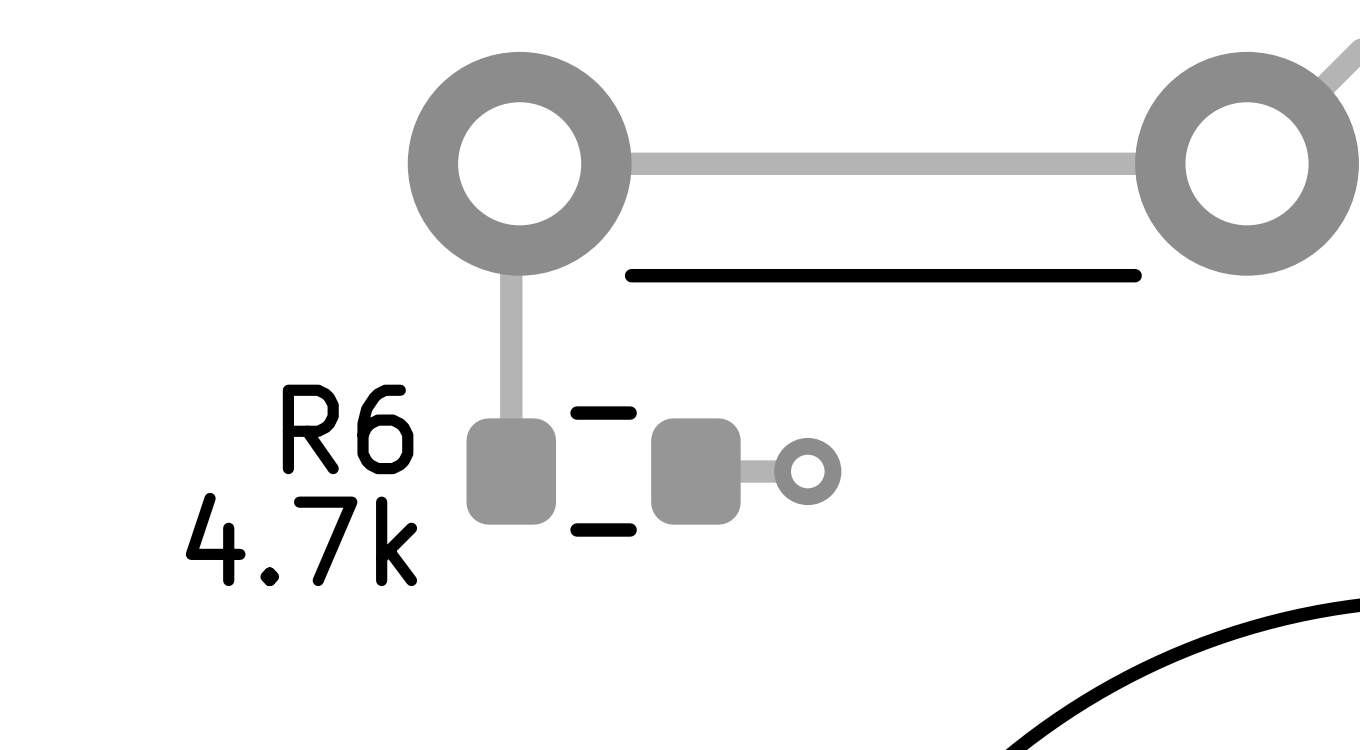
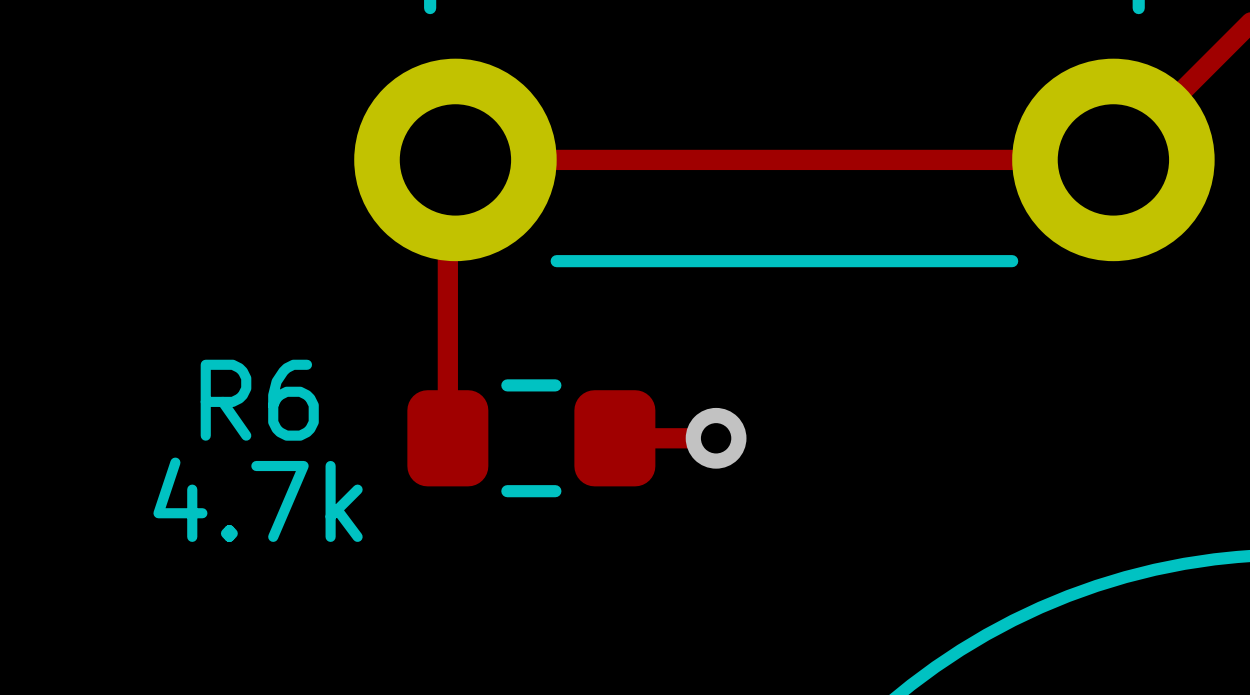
R6 name position: R6 (348, 429) -> R6 (259, 400)

